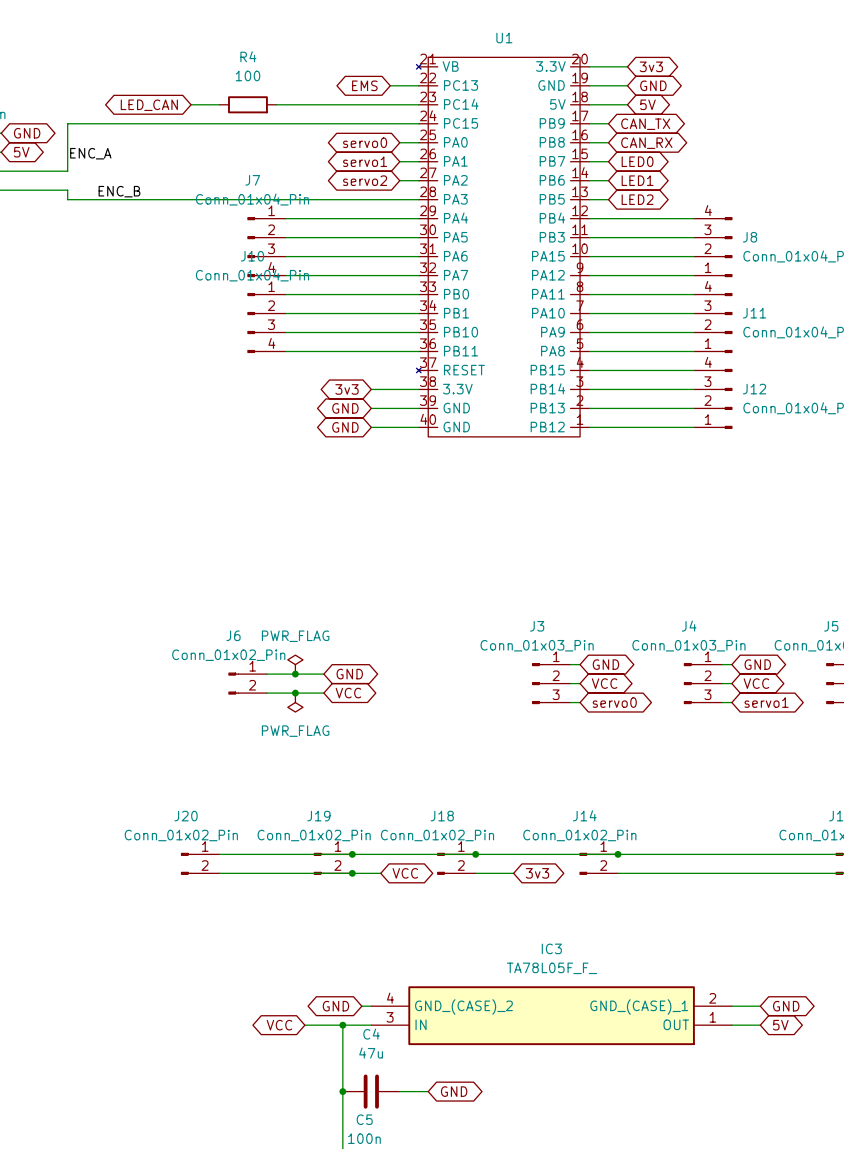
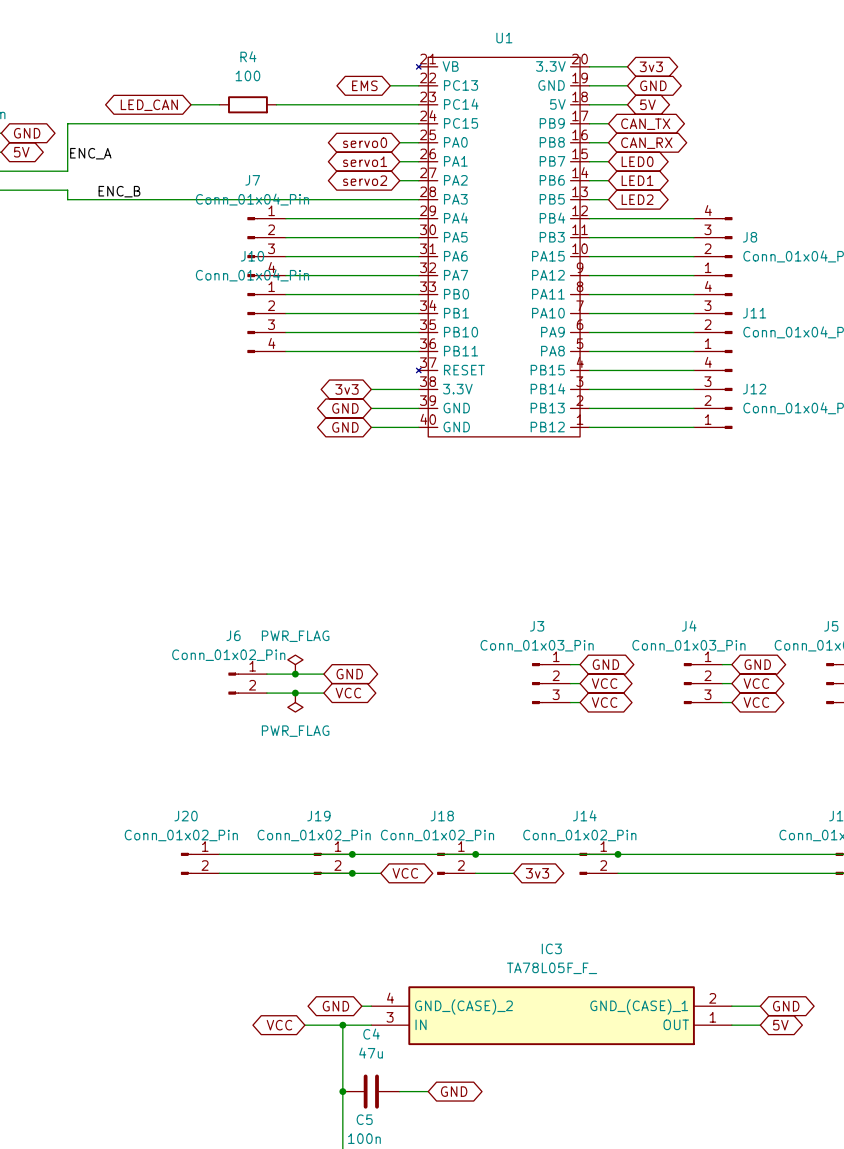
global label: servo0 (614, 702) -> VCC (604, 702)
global label: servo1 (766, 702) -> VCC (756, 702)

